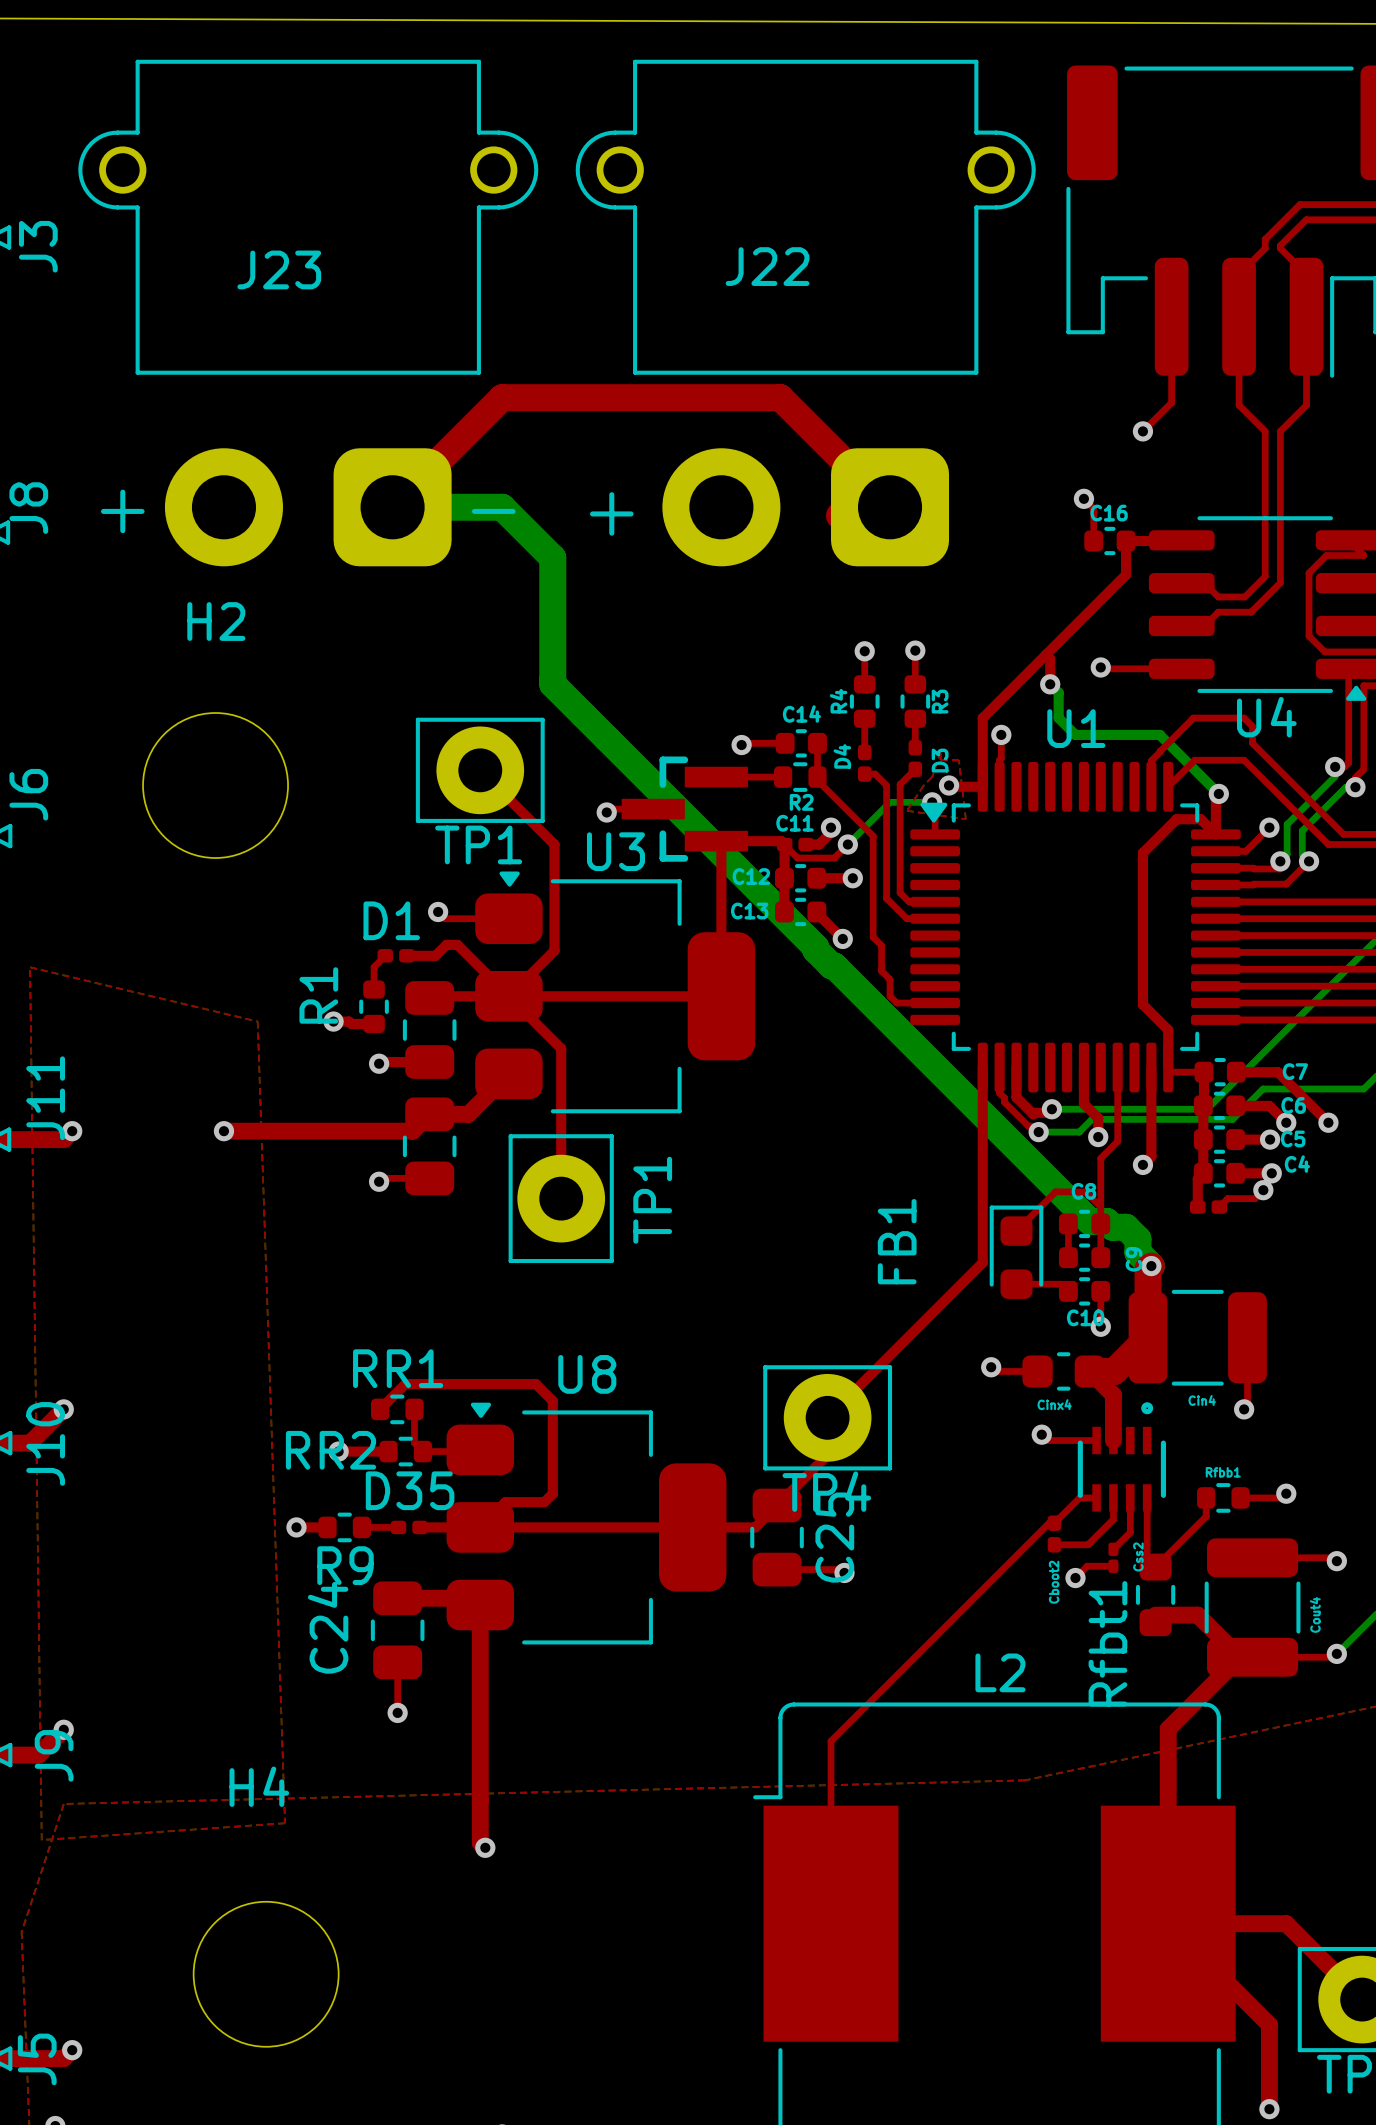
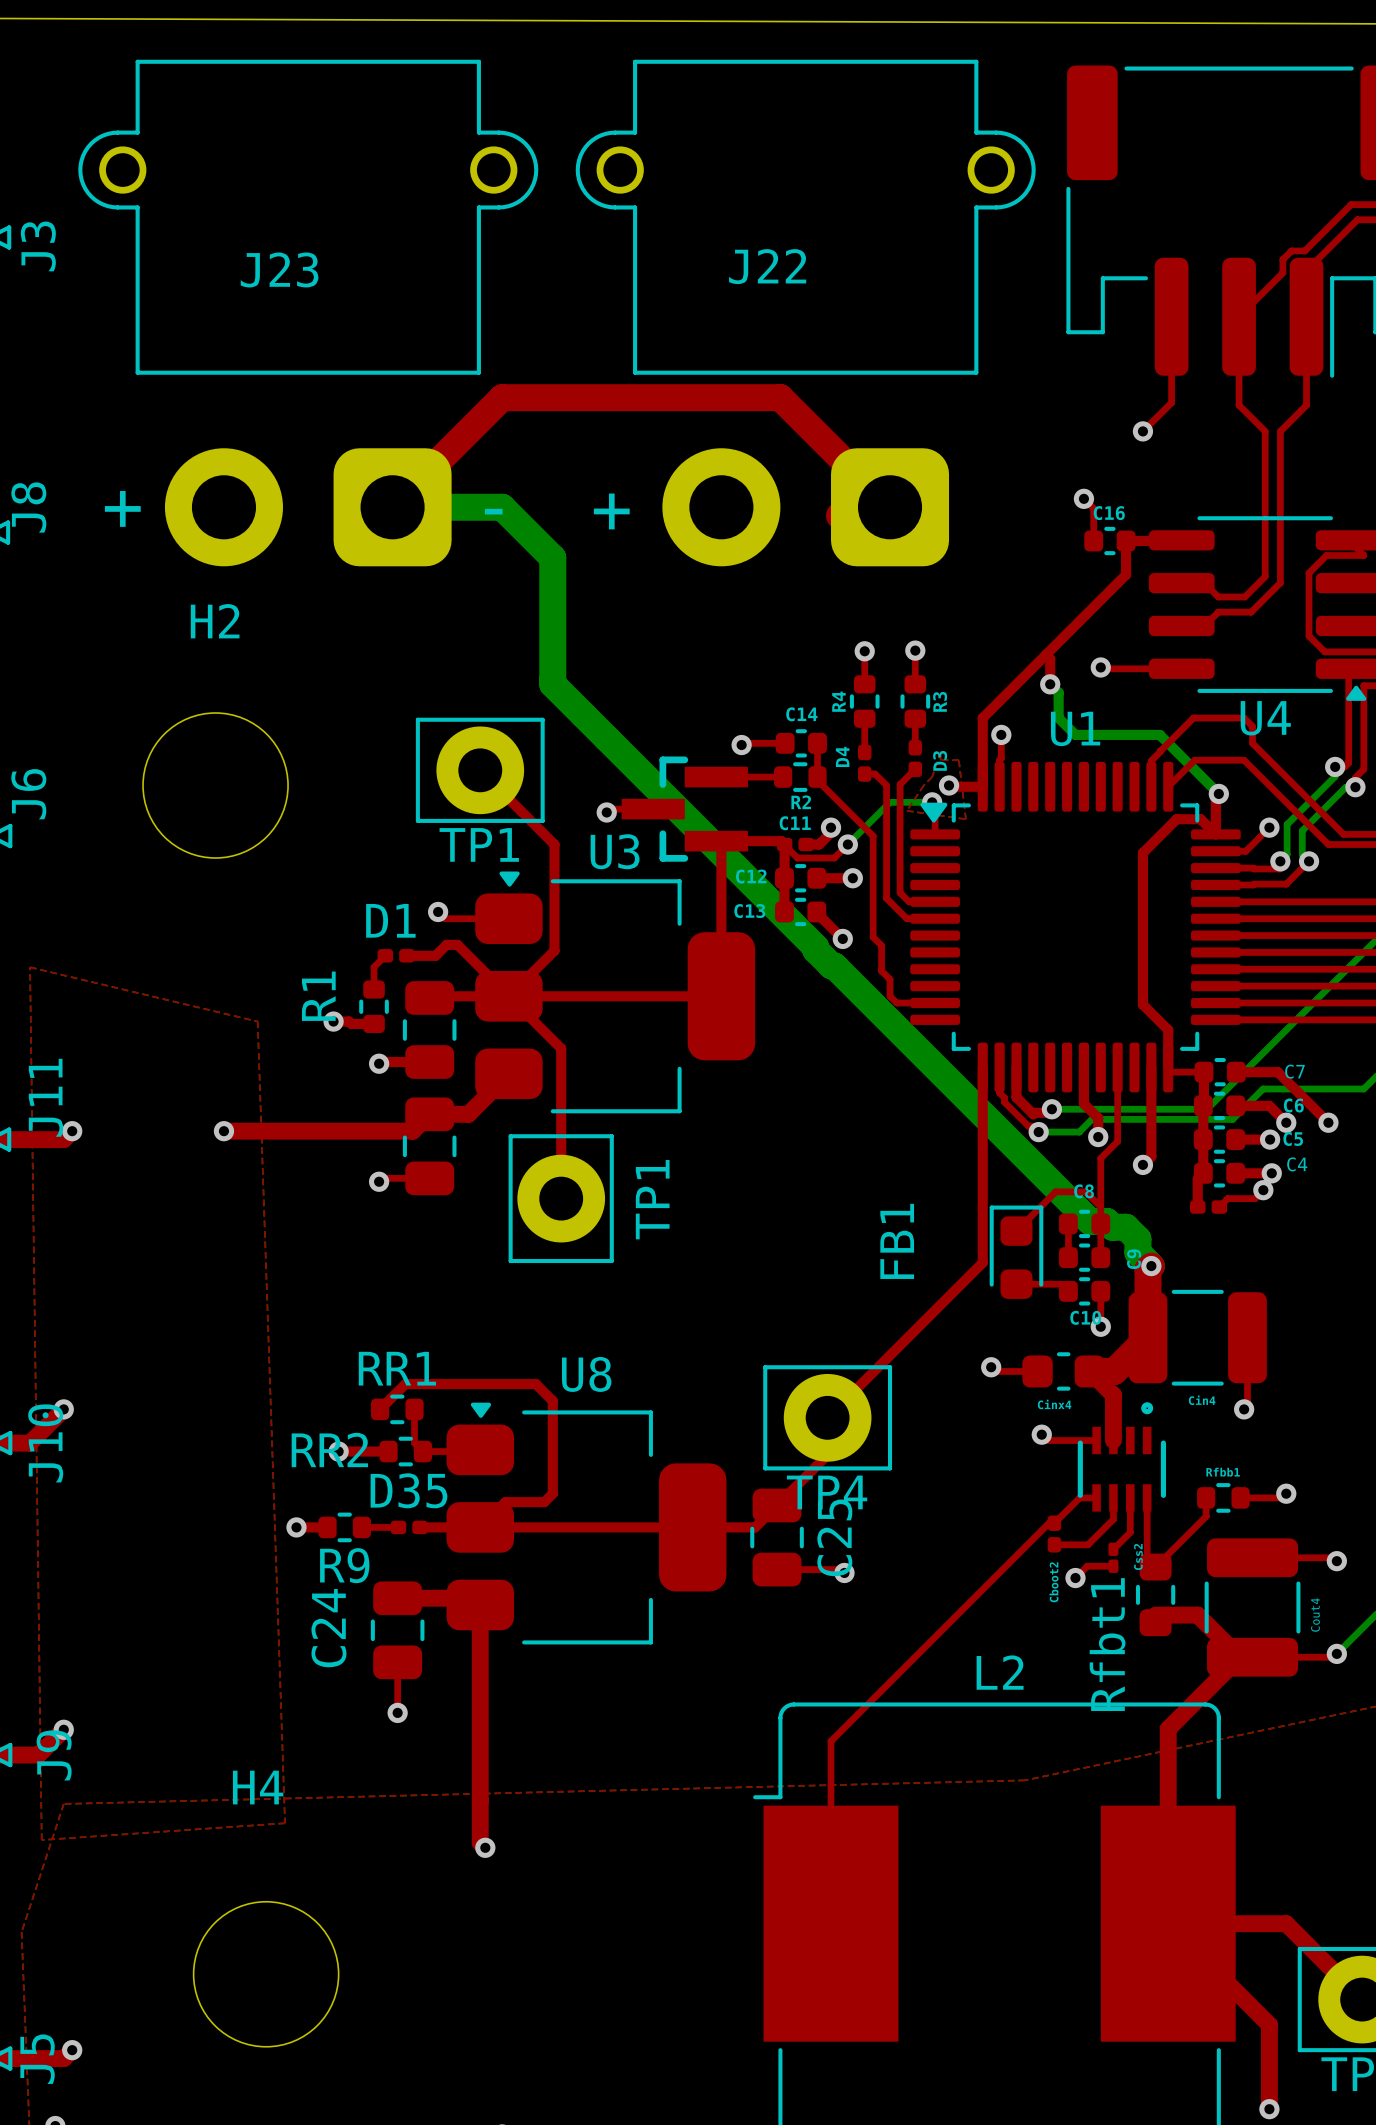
top track: (1351, 204) (1300, 204) (1265, 239) (1265, 248) (1239, 274) (1239, 316) -> (1351, 204) (1304, 250) (1291, 250) (1282, 259) (1282, 272) (1239, 316)
top track: (1357, 219) (1306, 219) (1280, 245) (1280, 248) (1306, 274) -> (1357, 219) (1306, 270) (1306, 274)

